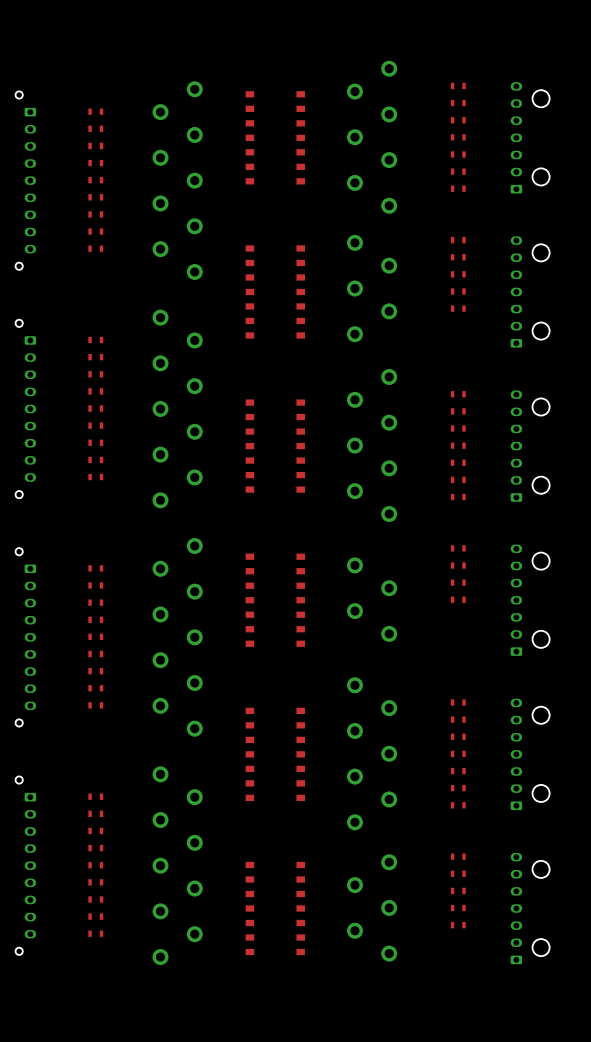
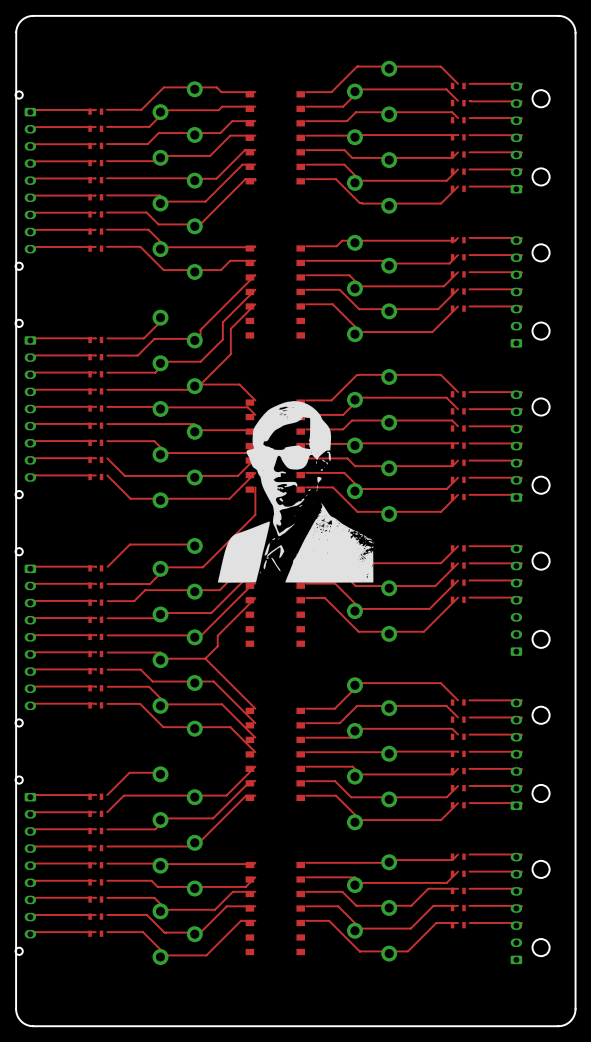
board edge: none -> (558, 15) (33, 15) (24, 18) (18, 24) (16, 32) (16, 1009) (18, 1017) (24, 1023) (33, 1026) (558, 1026) (566, 1023) (573, 1017) (575, 1009) (575, 33) (570, 20) (558, 15)
top track: none -> (458, 83) (440, 66) (357, 66) (331, 92) (306, 92)
top track: none -> (469, 83) (521, 84)
top track: none -> (255, 92) (221, 92) (216, 87) (163, 87) (141, 109) (106, 109)
top track: none -> (458, 100) (446, 89) (360, 89) (343, 106) (306, 106)
top track: none -> (469, 100) (521, 101)
top track: none -> (255, 106) (222, 106) (218, 110) (166, 110) (149, 126) (106, 126)
top track: none -> (95, 109) (35, 109)
top track: none -> (458, 118) (452, 112) (355, 112) (347, 121) (306, 121)
top track: none -> (469, 118) (521, 118)
top track: none -> (255, 121) (232, 121) (220, 133) (158, 133) (147, 144) (106, 144)
top track: none -> (95, 126) (35, 127)
top track: none -> (255, 135) (230, 135) (210, 155) (166, 155) (160, 161) (106, 161)
top track: none -> (458, 135) (306, 135)
top track: none -> (469, 135) (521, 135)
top track: none -> (95, 144) (35, 144)
top track: none -> (255, 150) (245, 150) (216, 178) (106, 178)
top track: none -> (306, 150) (344, 150) (352, 157) (452, 157) (458, 152)
top track: none -> (469, 152) (521, 152)
top track: none -> (95, 161) (35, 161)
top track: none -> (255, 164) (242, 164) (205, 201) (166, 201) (159, 195) (106, 195)
top track: none -> (306, 164) (344, 164) (360, 180) (446, 180) (458, 169)
top track: none -> (469, 169) (521, 169)
top track: none -> (95, 178) (35, 178)
top track: none -> (306, 179) (335, 179) (359, 203) (362, 203) (441, 203) (458, 186)
top track: none -> (255, 180) (255, 179) (245, 179) (200, 224) (158, 224) (146, 212) (106, 212)
top track: none -> (469, 186) (521, 187)
top track: none -> (95, 195) (35, 195)
top track: none -> (95, 212) (35, 212)
top track: none -> (95, 229) (35, 229)
top track: none -> (106, 229) (148, 229) (166, 247) (255, 246)
top track: none -> (458, 237) (455, 240) (342, 240) (336, 246) (306, 246)
top track: none -> (469, 237) (521, 238)
top track: none -> (95, 246) (35, 246)
top track: none -> (106, 246) (140, 246) (163, 270) (220, 270) (230, 260) (255, 260)
top track: none -> (458, 255) (449, 263) (394, 263) (391, 260) (306, 260)
top track: none -> (469, 255) (521, 255)
top track: none -> (458, 272) (443, 286) (360, 286) (349, 275) (306, 275)
top track: none -> (469, 272) (521, 272)
top track: none -> (255, 275) (200, 329) (200, 338) (154, 338) (137, 355) (107, 355)
top track: none -> (255, 289) (222, 322) (222, 339) (200, 361) (166, 361) (155, 372) (107, 372)
top track: none -> (458, 289) (438, 309) (359, 309) (339, 289) (306, 289)
top track: none -> (469, 289) (521, 289)
top track: none -> (255, 304) (230, 328) (230, 354) (195, 389) (107, 389)
top track: none -> (306, 304) (332, 304) (360, 332) (432, 332) (458, 306)
top track: none -> (469, 306) (521, 306)
top track: none -> (166, 316) (143, 338) (107, 338)
top track: none -> (35, 338) (95, 338)
top track: none -> (35, 355) (95, 355)
top track: none -> (35, 372) (95, 372)
top track: none -> (200, 384) (239, 384) (255, 400)
top track: none -> (35, 389) (95, 389)
top track: none -> (458, 392) (440, 374) (358, 374) (331, 400) (306, 400)
top track: none -> (469, 392) (521, 392)
drawing: none -> [217, 401, 374, 583]
top track: none -> (35, 406) (95, 406)
top track: none -> (107, 406) (247, 407) (255, 414)
top track: none -> (458, 409) (446, 397) (360, 397) (343, 414) (306, 414)
top track: none -> (469, 409) (521, 409)
top track: none -> (35, 423) (95, 424)
top track: none -> (107, 424) (194, 424) (200, 430) (255, 429)
top track: none -> (458, 426) (452, 420) (351, 420) (343, 429) (306, 429)
top track: none -> (469, 426) (521, 426)
top track: none -> (35, 441) (95, 441)
top track: none -> (107, 441) (154, 441) (166, 453) (246, 453) (255, 443)
top track: none -> (458, 443) (306, 443)
top track: none -> (469, 443) (521, 443)
top track: none -> (35, 458) (95, 458)
top track: none -> (107, 458) (124, 475) (237, 475) (255, 458)
top track: none -> (306, 458) (347, 458) (355, 466) (452, 466) (458, 460)
top track: none -> (469, 460) (521, 461)
top track: none -> (255, 472) (229, 498) (130, 498) (107, 475)
top track: none -> (306, 472) (344, 472) (360, 489) (446, 489) (458, 477)
top track: none -> (35, 475) (95, 475)
top track: none -> (469, 477) (521, 478)
top track: none -> (255, 487) (255, 514) (202, 567) (166, 567) (149, 584) (107, 584)
top track: none -> (306, 487) (333, 487) (357, 511) (441, 511) (458, 494)
top track: none -> (469, 494) (521, 495)
top track: none -> (200, 544) (129, 544) (107, 566)
top track: none -> (458, 546) (441, 563) (360, 563) (351, 554) (306, 554)
top track: none -> (469, 546) (521, 546)
top track: none -> (255, 554) (219, 590) (145, 590) (134, 601) (107, 601)
top track: none -> (458, 563) (435, 586) (355, 586) (338, 569) (306, 569)
top track: none -> (469, 563) (521, 563)
top track: none -> (35, 566) (96, 566)
top track: none -> (255, 569) (211, 613) (166, 613) (161, 618) (107, 618)
top track: none -> (458, 580) (429, 608) (360, 608) (335, 583) (306, 583)
top track: none -> (469, 580) (521, 580)
top track: none -> (35, 583) (96, 584)
top track: none -> (255, 583) (253, 583) (200, 635) (107, 635)
top track: none -> (458, 597) (423, 631) (358, 631) (324, 598) (306, 598)
top track: none -> (469, 597) (521, 598)
top track: none -> (255, 598) (217, 635) (217, 646) (205, 658)
top track: none -> (35, 600) (96, 601)
top track: none -> (35, 618) (96, 618)
top track: none -> (35, 635) (96, 635)
top track: none -> (35, 652) (96, 652)
top track: none -> (107, 652) (160, 652) (166, 658) (205, 658)
top track: none -> (205, 658) (255, 708)
top track: none -> (35, 669) (96, 669)
top track: none -> (107, 669) (140, 669) (152, 681) (213, 681) (255, 723)
top track: none -> (35, 686) (96, 686)
top track: none -> (107, 686) (149, 686) (166, 704) (222, 704) (255, 737)
top track: none -> (458, 700) (440, 683) (360, 683) (334, 708) (306, 708)
top track: none -> (469, 700) (521, 700)
top track: none -> (35, 703) (96, 703)
top track: none -> (107, 703) (140, 703) (163, 727) (230, 727) (255, 752)
top track: none -> (458, 717) (446, 705) (357, 705) (339, 723) (306, 723)
top track: none -> (469, 717) (521, 717)
top track: none -> (458, 734) (452, 728) (360, 728) (351, 737) (306, 737)
top track: none -> (469, 734) (521, 735)
top track: none -> (458, 751) (306, 752)
top track: none -> (469, 751) (521, 752)
top track: none -> (255, 766) (226, 795) (123, 795) (107, 812)
top track: none -> (306, 766) (352, 766) (360, 774) (452, 774) (458, 768)
top track: none -> (469, 768) (521, 769)
top track: none -> (166, 772) (129, 772) (107, 795)
top track: none -> (255, 781) (250, 781) (213, 818) (166, 818) (155, 829) (107, 829)
top track: none -> (306, 781) (335, 781) (351, 797) (446, 797) (458, 785)
top track: none -> (469, 785) (521, 786)
top track: none -> (35, 795) (95, 795)
top track: none -> (255, 795) (246, 795) (195, 846) (107, 846)
top track: none -> (306, 795) (336, 795) (360, 820) (441, 820) (458, 803)
top track: none -> (469, 803) (521, 803)
top track: none -> (35, 812) (95, 812)
top track: none -> (35, 829) (95, 829)
top track: none -> (35, 846) (95, 846)
top track: none -> (458, 854) (452, 860) (394, 860) (391, 862) (306, 862)
top track: none -> (469, 854) (521, 854)
top track: none -> (255, 862) (107, 863)
top track: none -> (35, 863) (95, 863)
top track: none -> (458, 871) (446, 882) (360, 882) (354, 877) (306, 877)
top track: none -> (469, 871) (521, 872)
top track: none -> (255, 877) (245, 886) (157, 887) (151, 880) (107, 880)
top track: none -> (35, 880) (95, 880)
top track: none -> (458, 888) (428, 888) (411, 905) (356, 905) (342, 891) (306, 891)
top track: none -> (469, 888) (521, 889)
top track: none -> (255, 891) (232, 891) (214, 909) (166, 909) (154, 897) (107, 897)
top track: none -> (35, 897) (95, 897)
top track: none -> (458, 905) (433, 905) (410, 928) (360, 928) (338, 906) (306, 906)
top track: none -> (469, 905) (521, 906)
top track: none -> (255, 906) (226, 906) (200, 932) (164, 932) (146, 915) (107, 915)
top track: none -> (35, 914) (95, 915)
top track: none -> (255, 920) (241, 920) (206, 955) (166, 955) (142, 932) (107, 932)
top track: none -> (306, 920) (329, 920) (359, 951) (407, 951) (436, 923) (458, 923)
top track: none -> (469, 923) (521, 923)
top track: none -> (35, 932) (95, 932)

